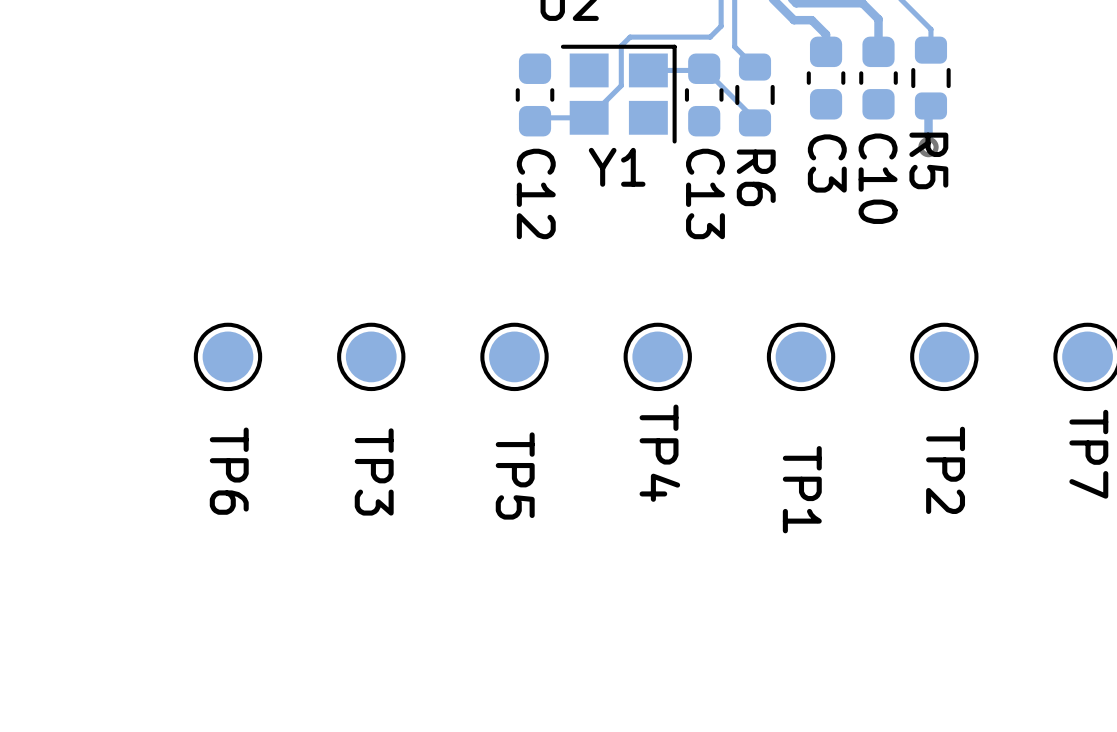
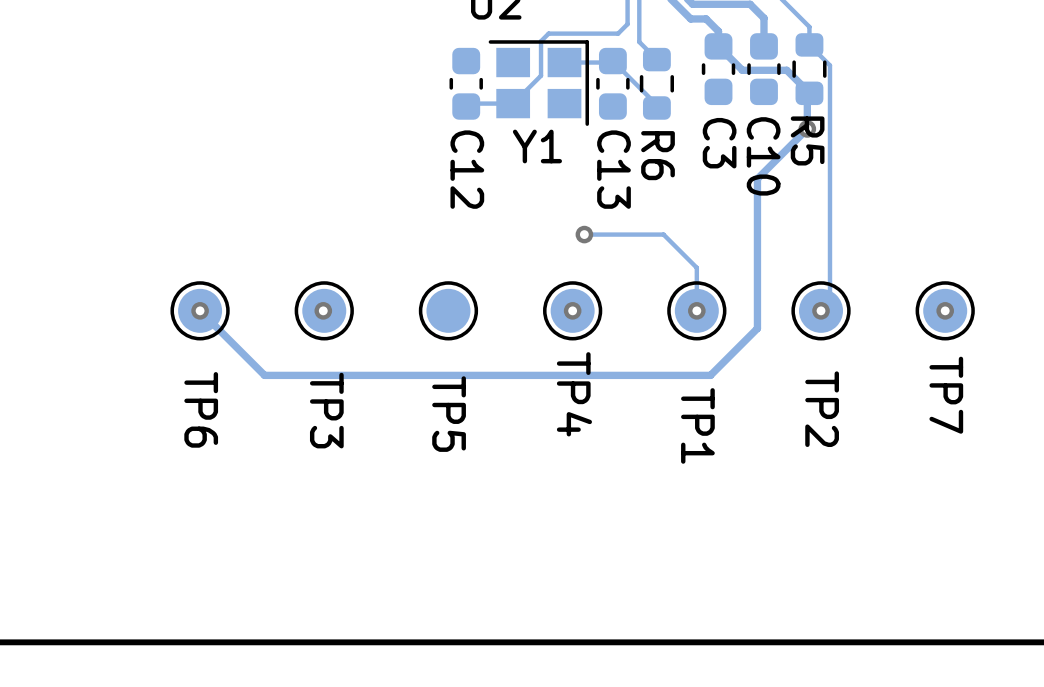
track: none -> (809, 44) (829, 65) (829, 301) (821, 310)
track: none -> (718, 46) (742, 70) (786, 70) (809, 92)
track: none -> (807, 128) (757, 178) (757, 328) (710, 375) (264, 375) (200, 310)
track: none -> (584, 234) (663, 234) (696, 267) (696, 310)
via: none -> (584, 234)
via: none -> (200, 310)
via: none -> (323, 310)
via: none -> (572, 310)
via: none -> (696, 310)
via: none -> (821, 310)
via: none -> (945, 310)

